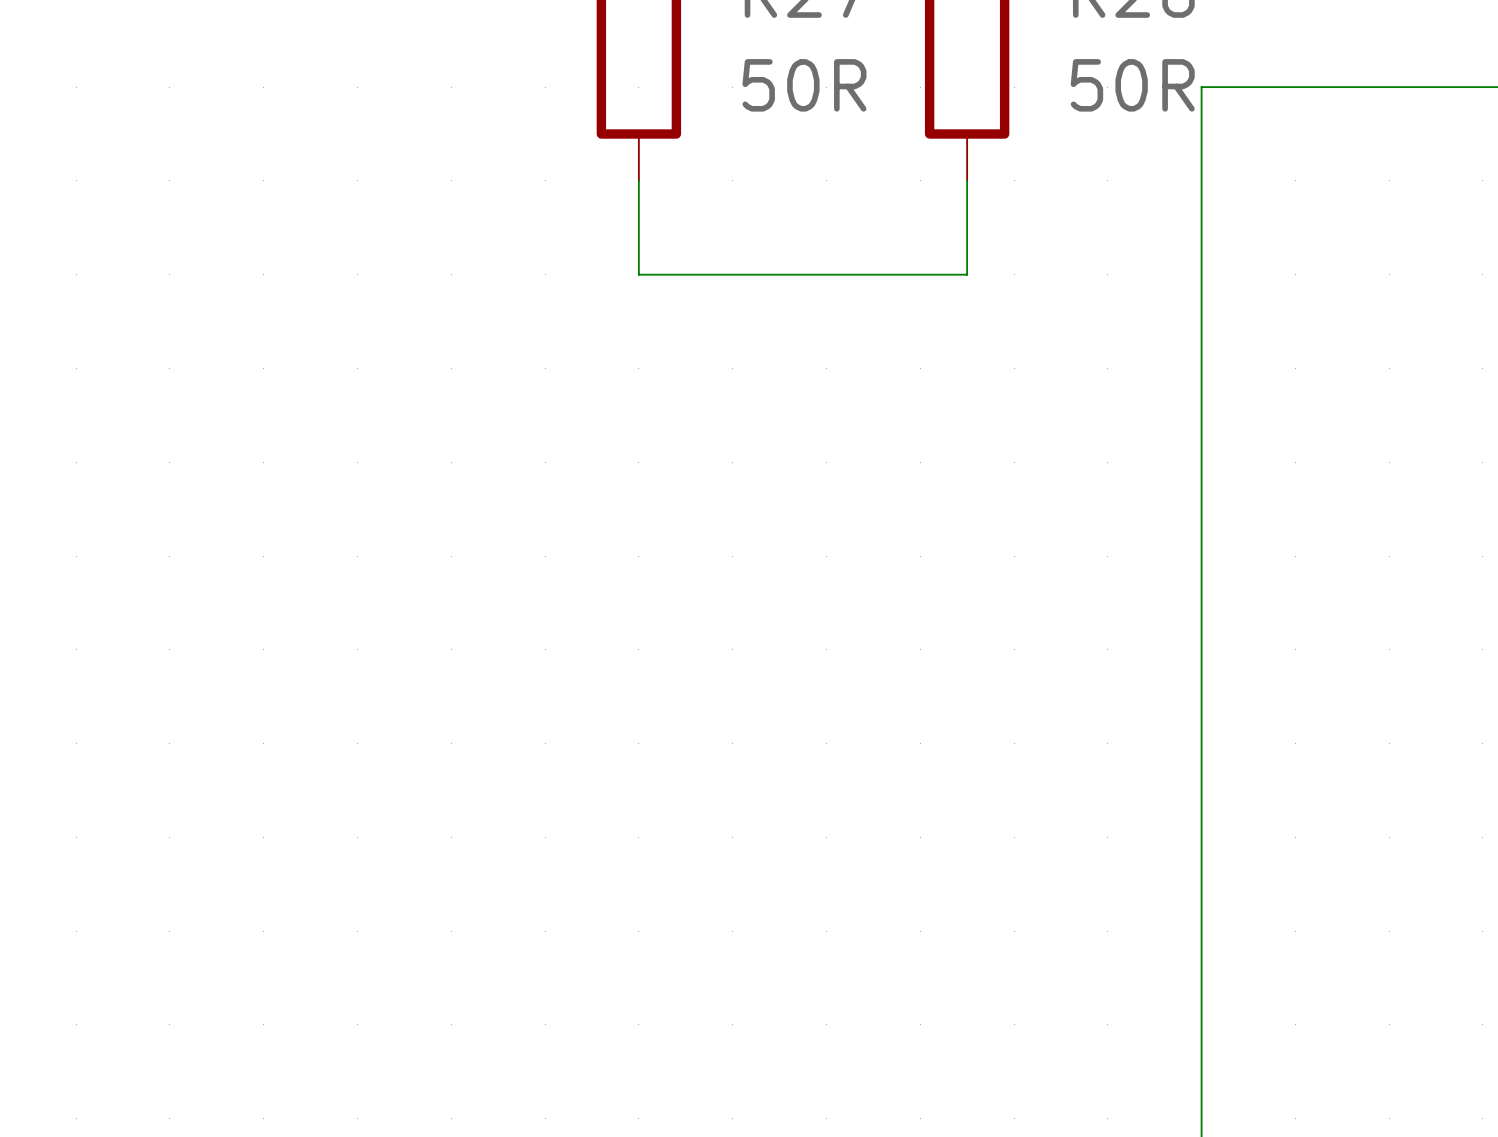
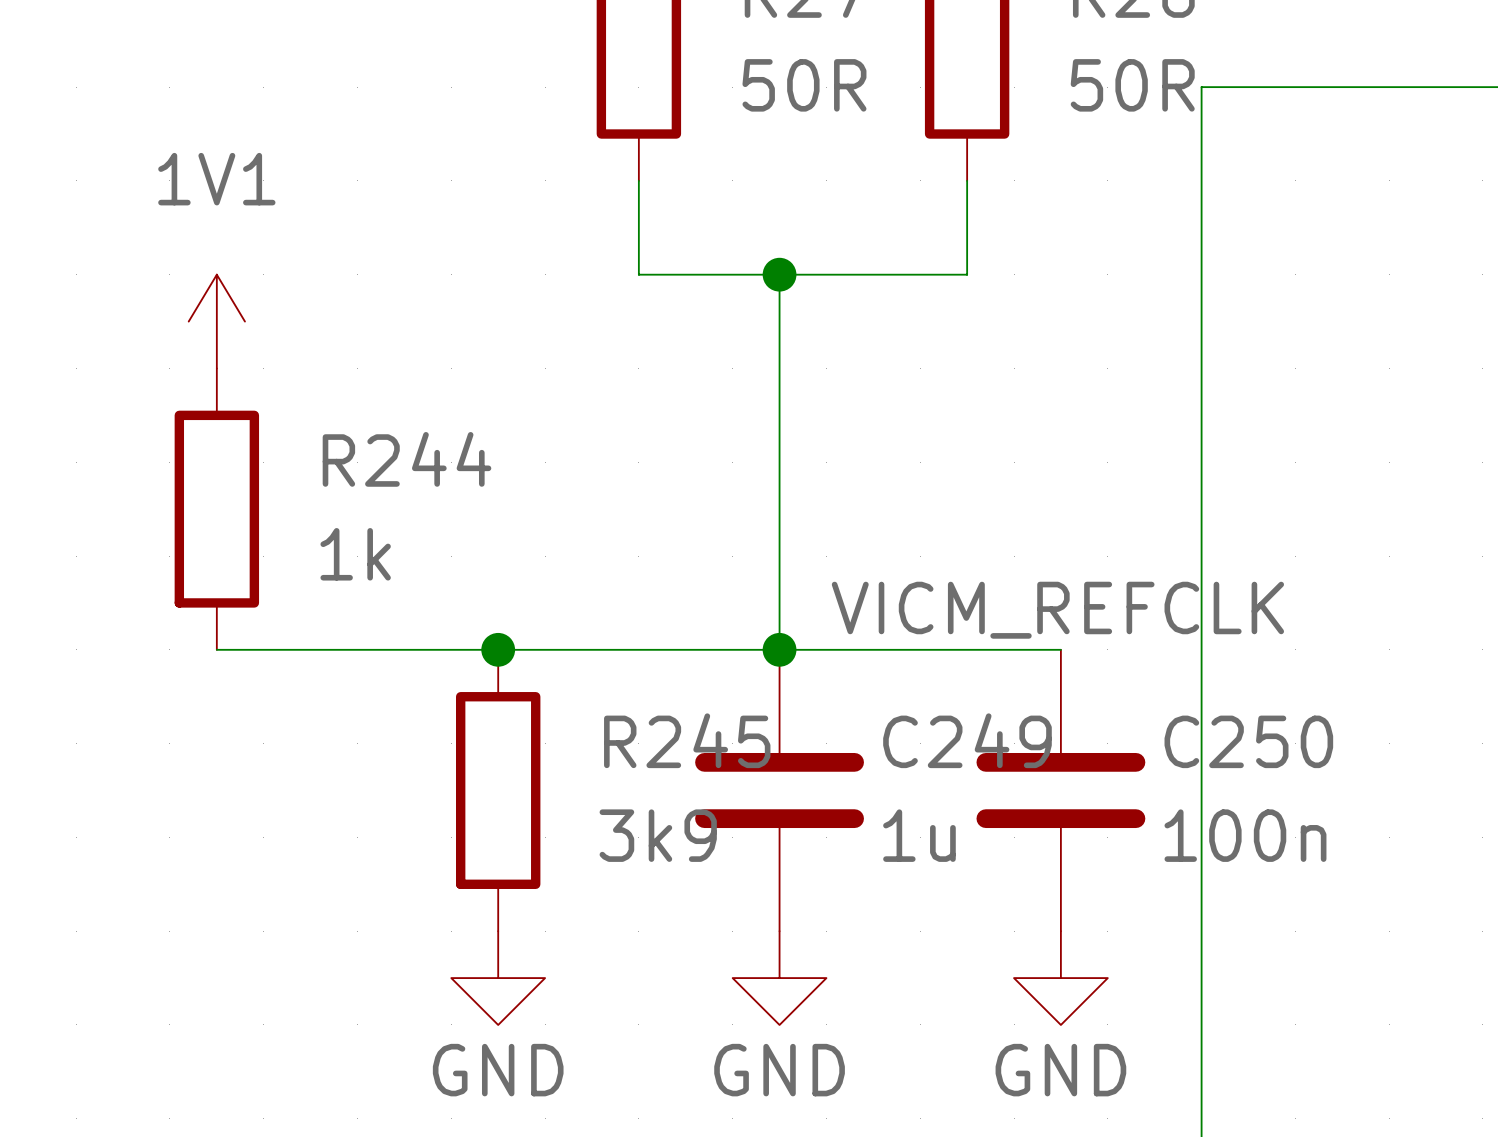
wire: none -> (779, 274) (779, 649)
junction: none -> (779, 274)
power symbol: none -> 1V1 (216, 321)
R244: none -> 1k (216, 509)
label: none -> VICM_REFCLK (1057, 610)
wire: none -> (216, 649) (1060, 649)
junction: none -> (498, 649)
junction: none -> (779, 649)
R245: none -> 3k9 (498, 790)
C249: none -> 1u (779, 790)
C250: none -> 100n (1060, 790)
power symbol: none -> GND (498, 978)
power symbol: none -> GND (779, 978)
power symbol: none -> GND (1060, 978)

